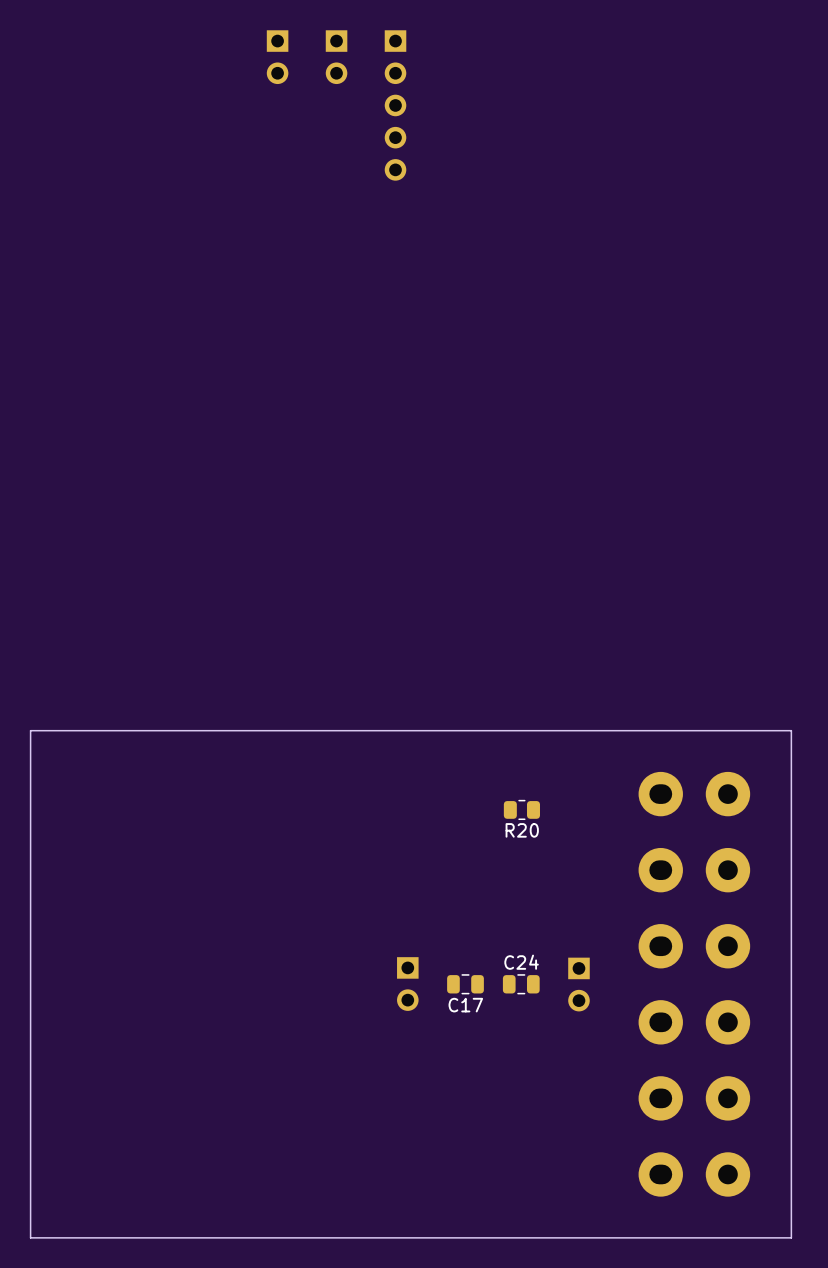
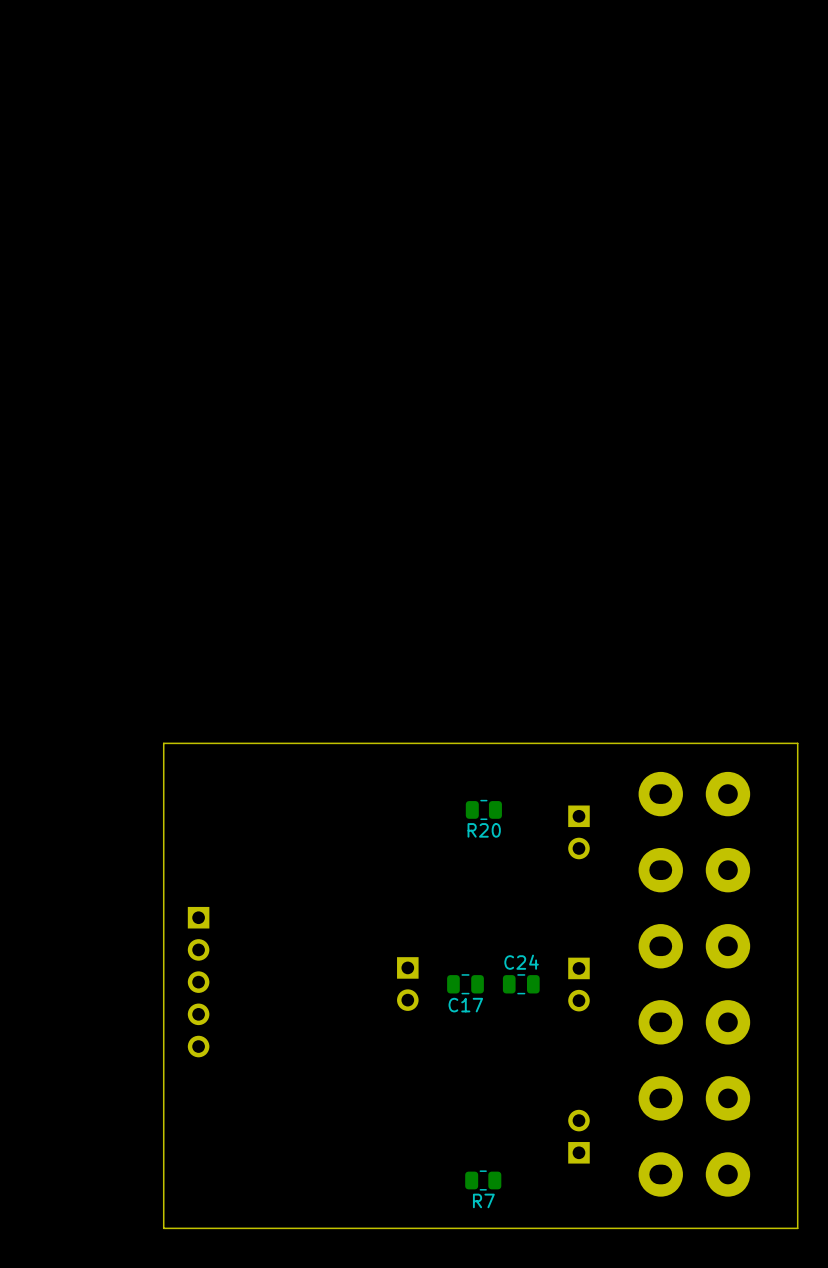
part: (277, 57) -> none
part: (336, 57) -> none
part: (395, 105) -> none
board edge: (791, 730) (791, 1237) (30, 1237) (30, 730) (791, 730) -> (797, 743) (797, 1228) (163, 1228) (163, 743) (797, 743)
R20 position: (521, 809) -> (483, 809)
part: none -> (578, 832)
part: none -> (198, 982)
part: none -> (578, 1136)
R7: none -> (483, 1180)

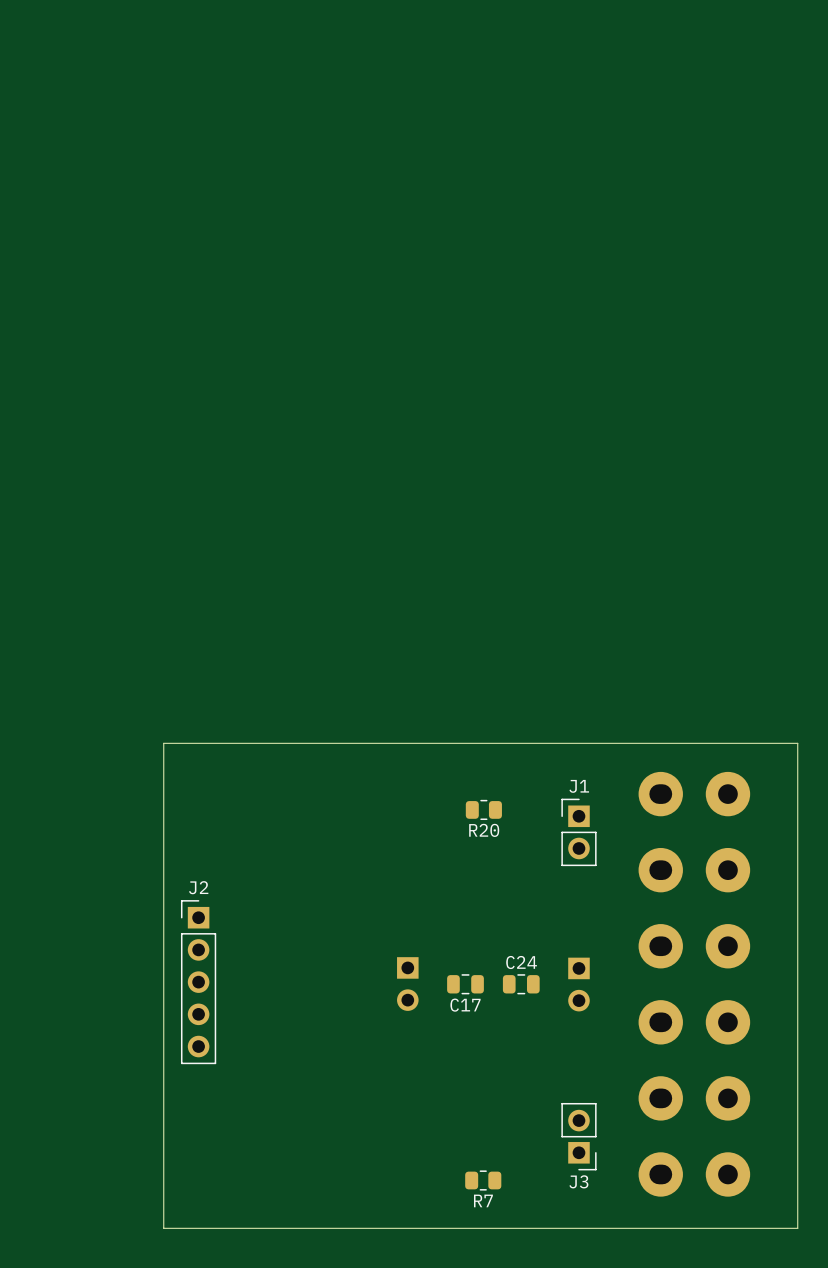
J1 side: top (578, 832) -> bottom (578, 832)
J2 side: top (198, 982) -> bottom (198, 982)
J3 side: top (578, 1136) -> bottom (578, 1136)

